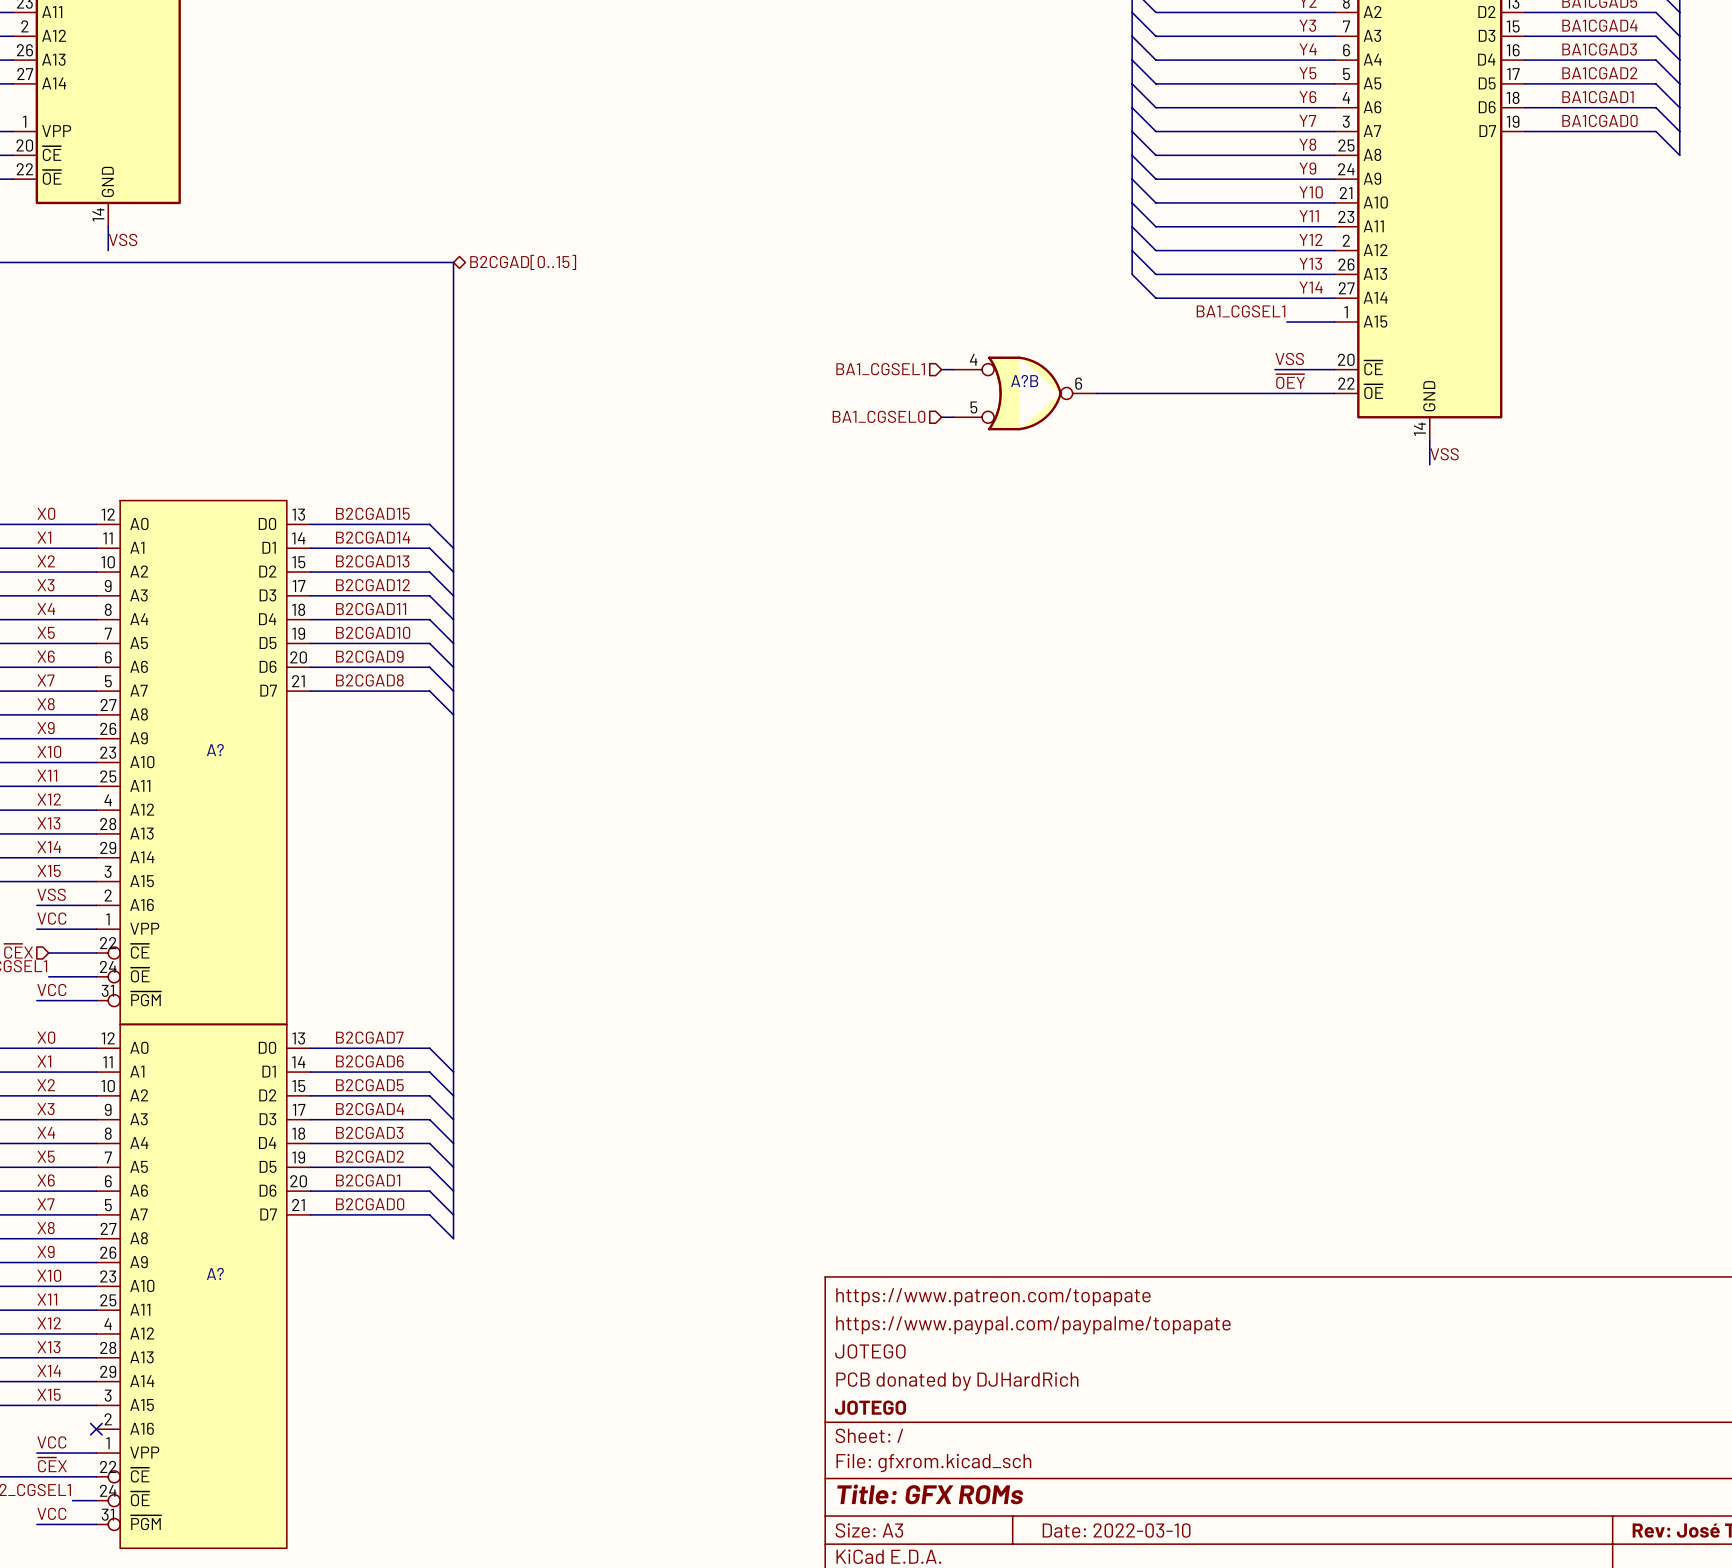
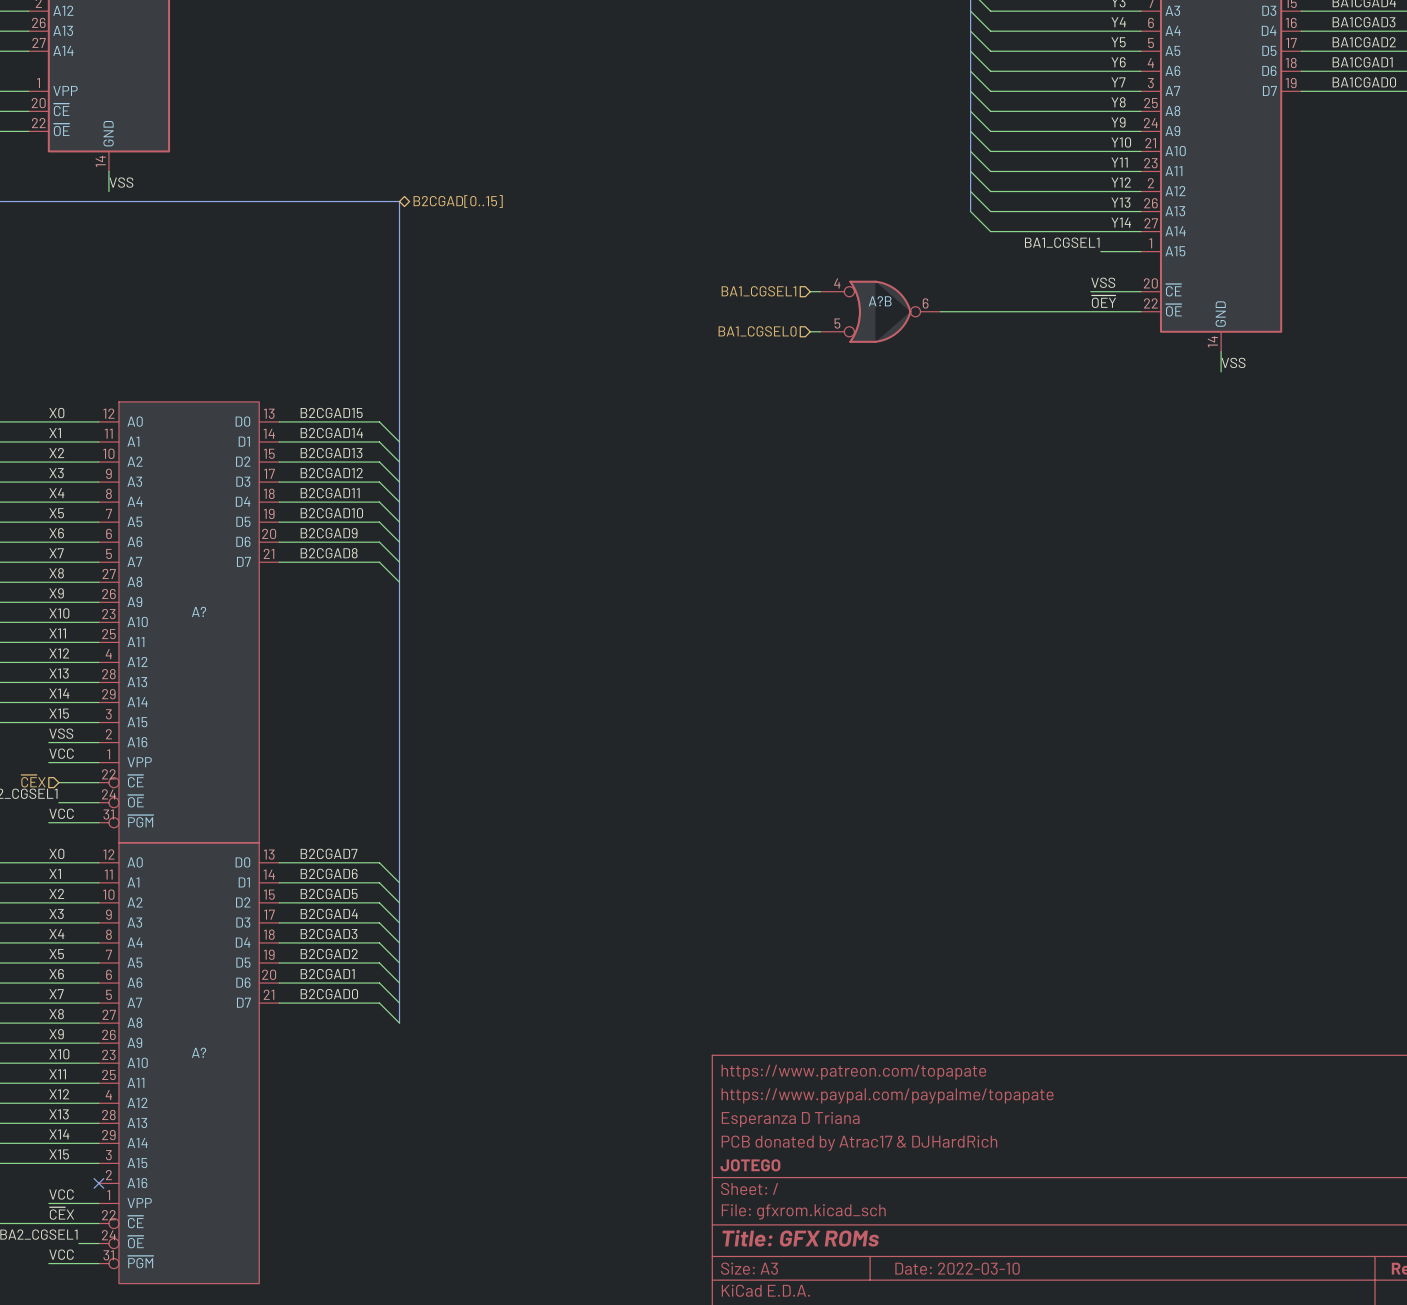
title block: JOTEGO (870, 1351) -> Esperanza D Triana (790, 1119)
title block: PCB donated by DJHardRich (957, 1381) -> PCB donated by Atrac17 & DJHardRich (859, 1143)

